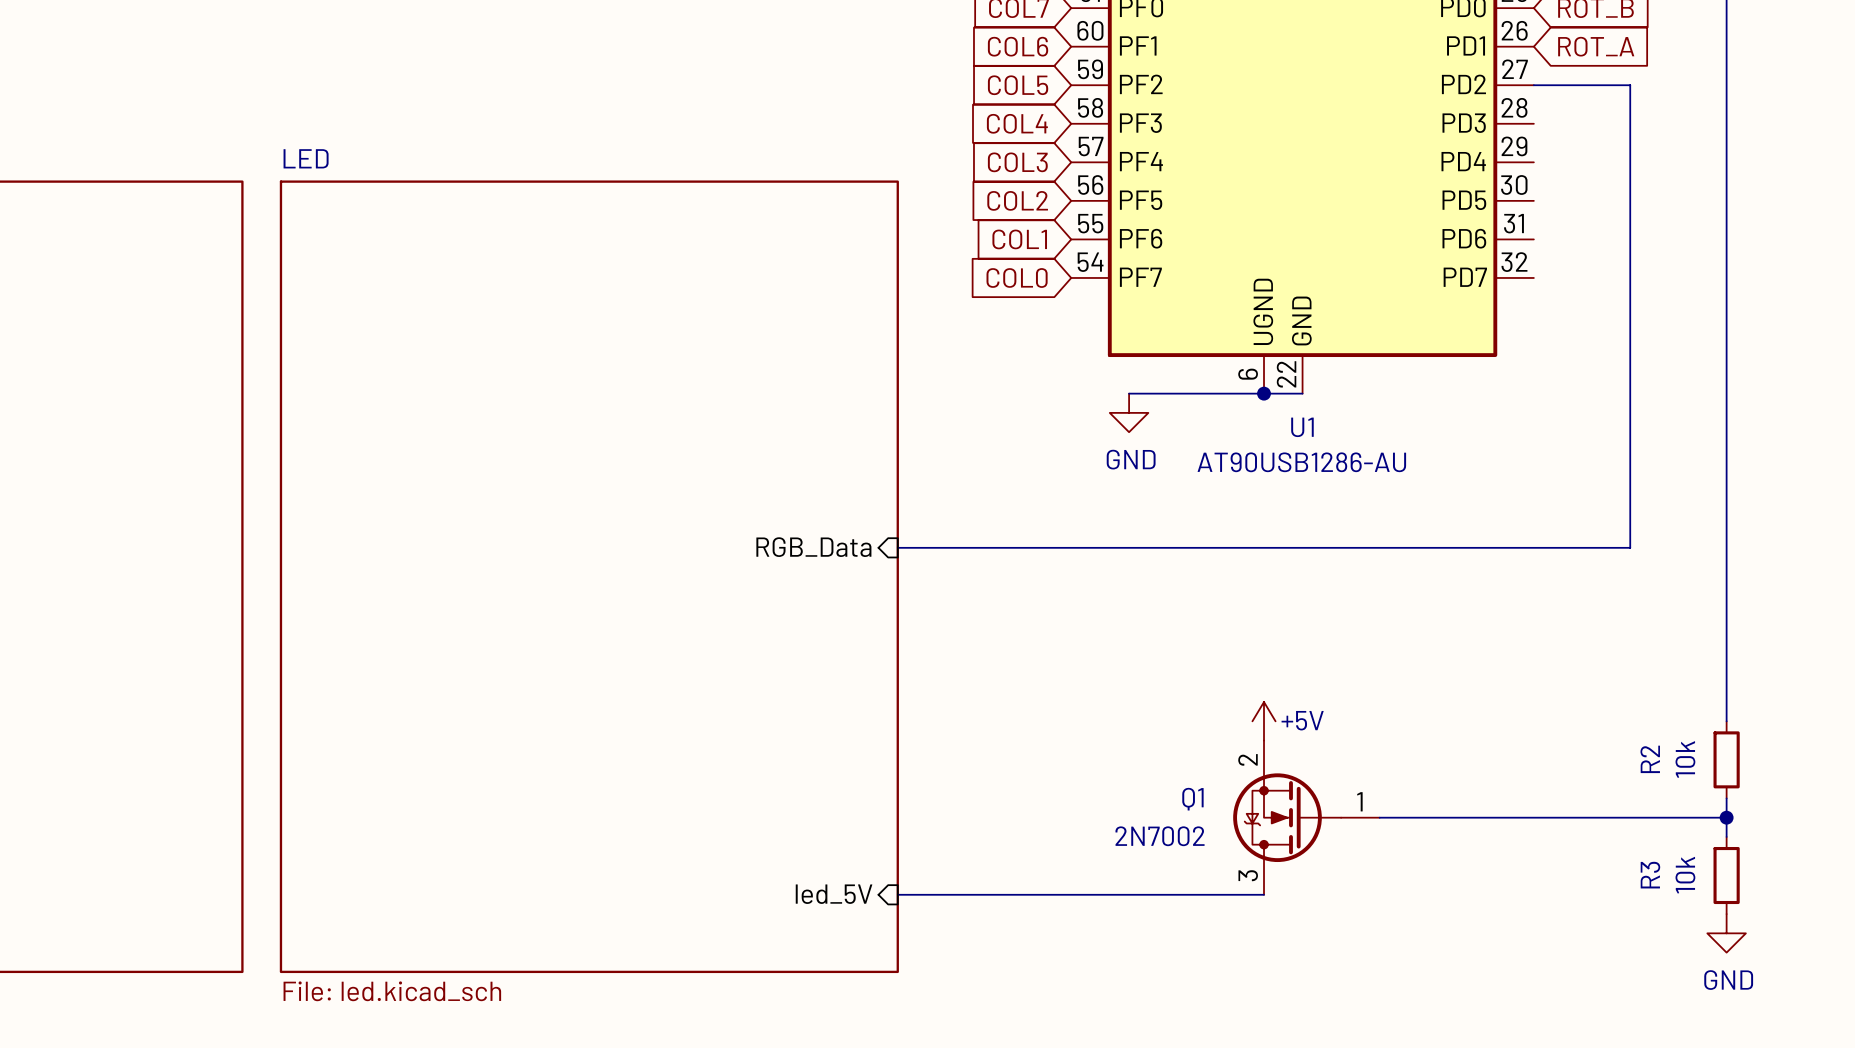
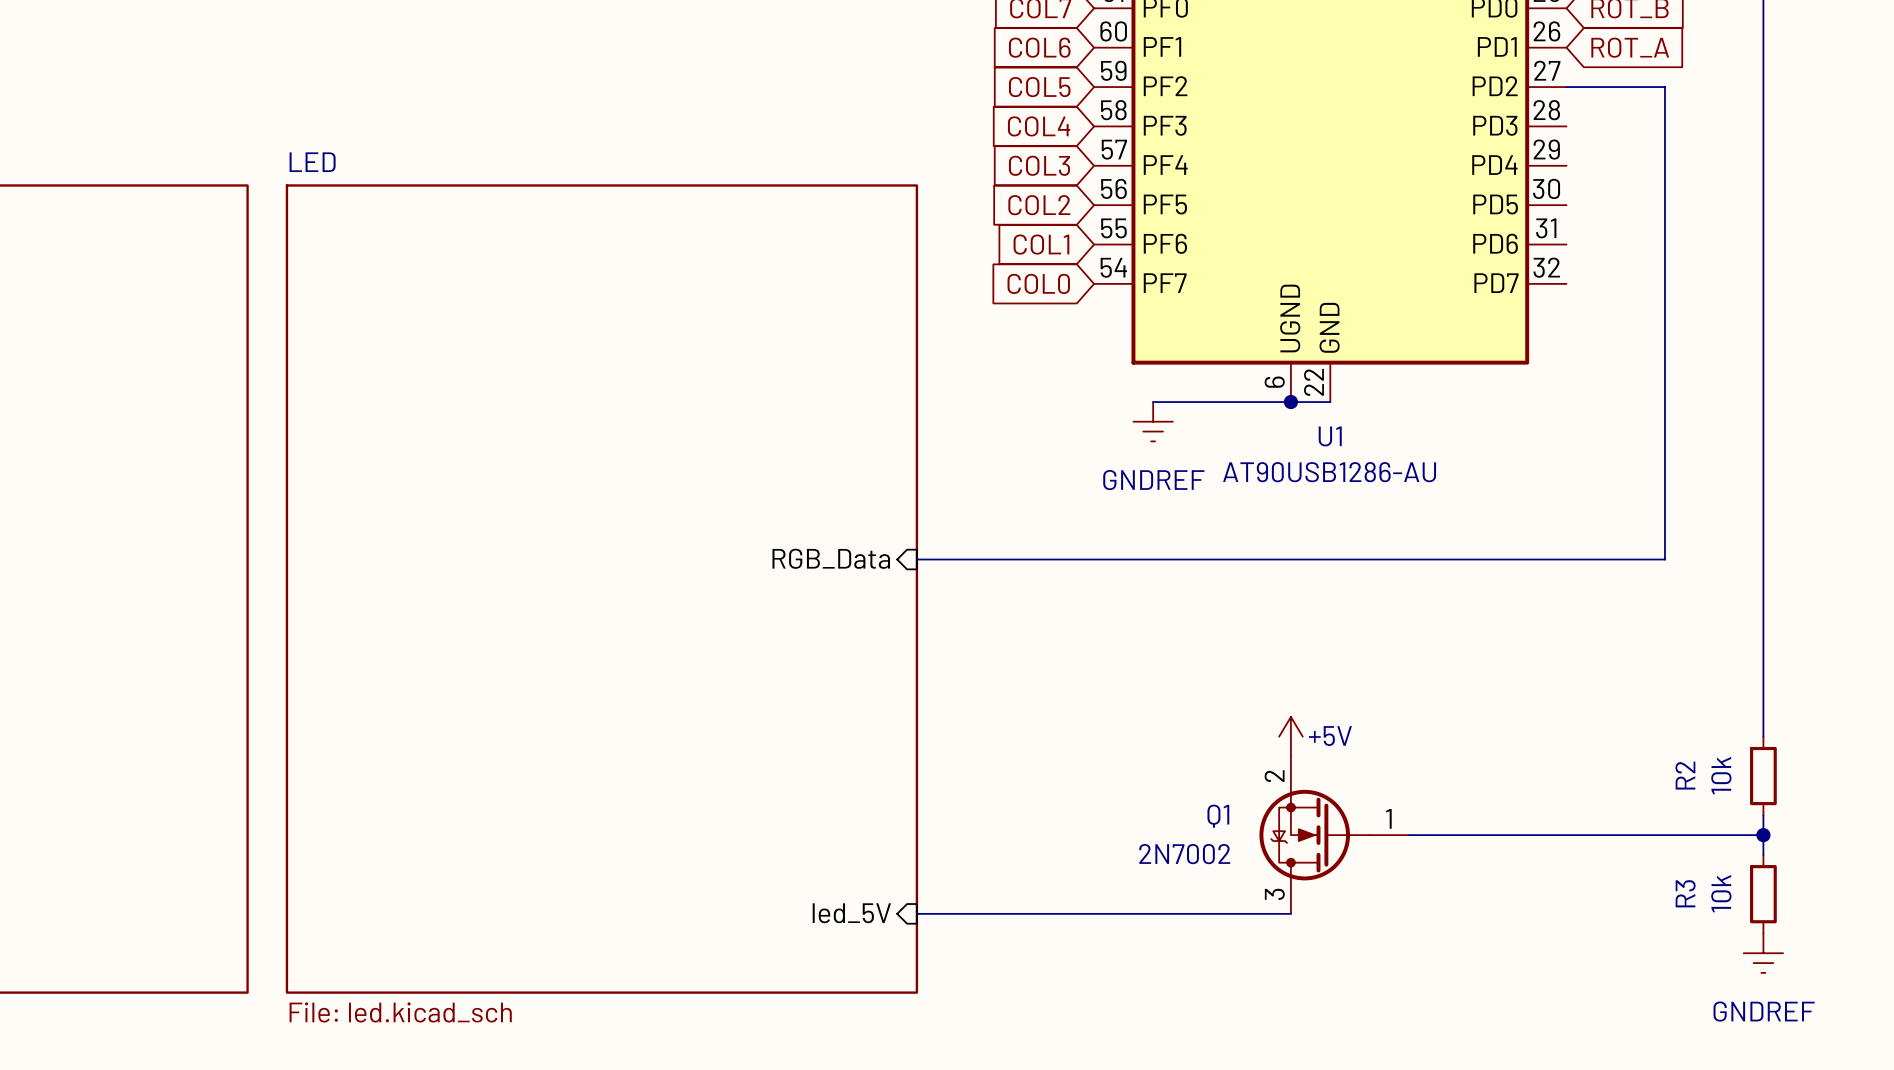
power symbol: GND (1129, 412) -> GNDREF (1153, 421)
power symbol: GND (1726, 933) -> GNDREF (1763, 953)

